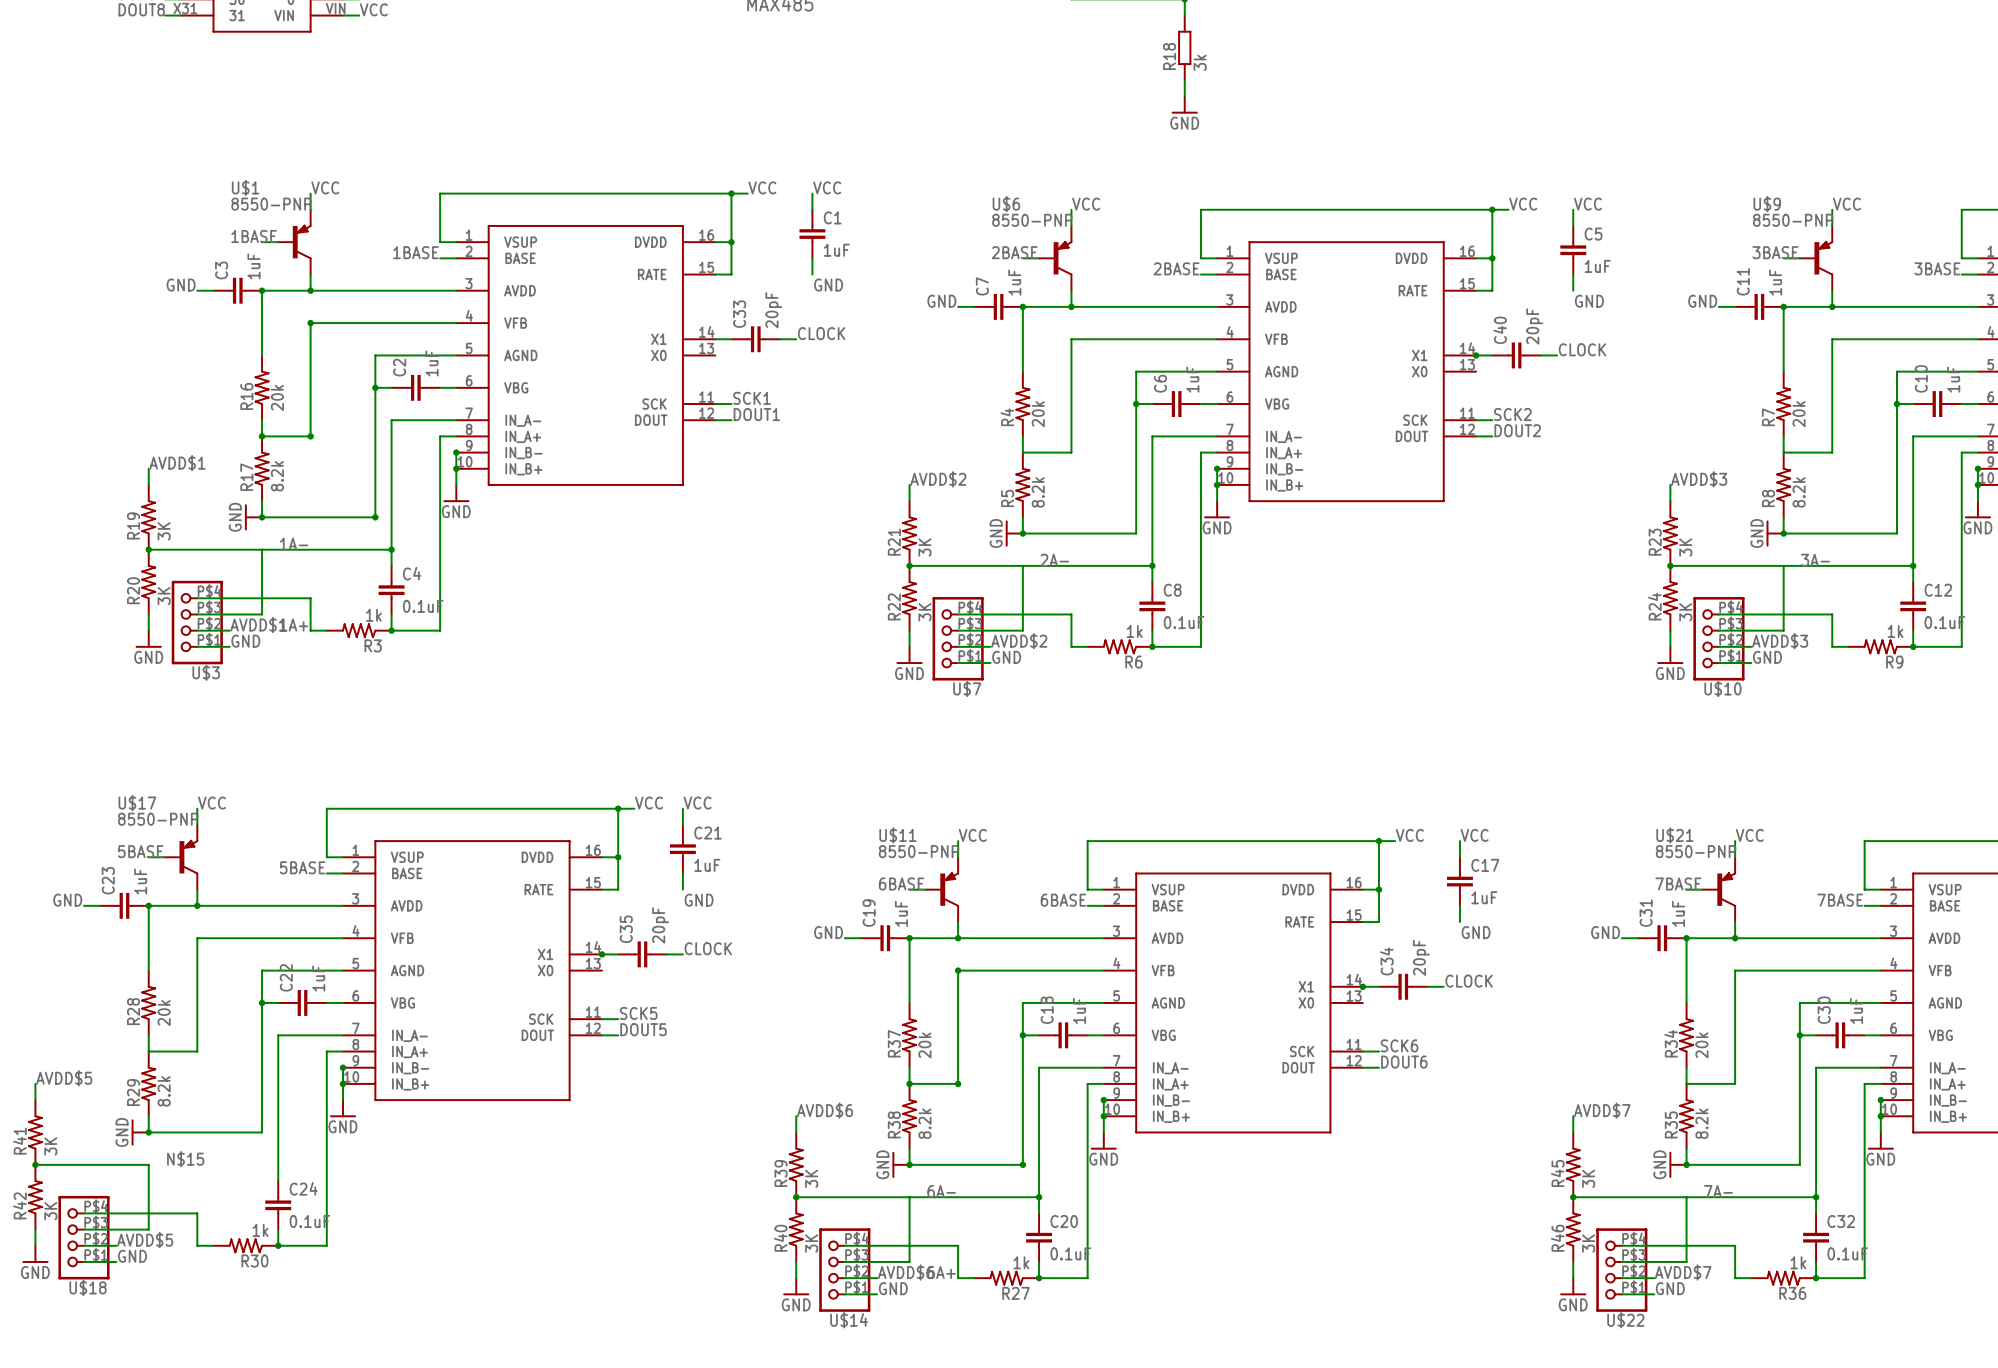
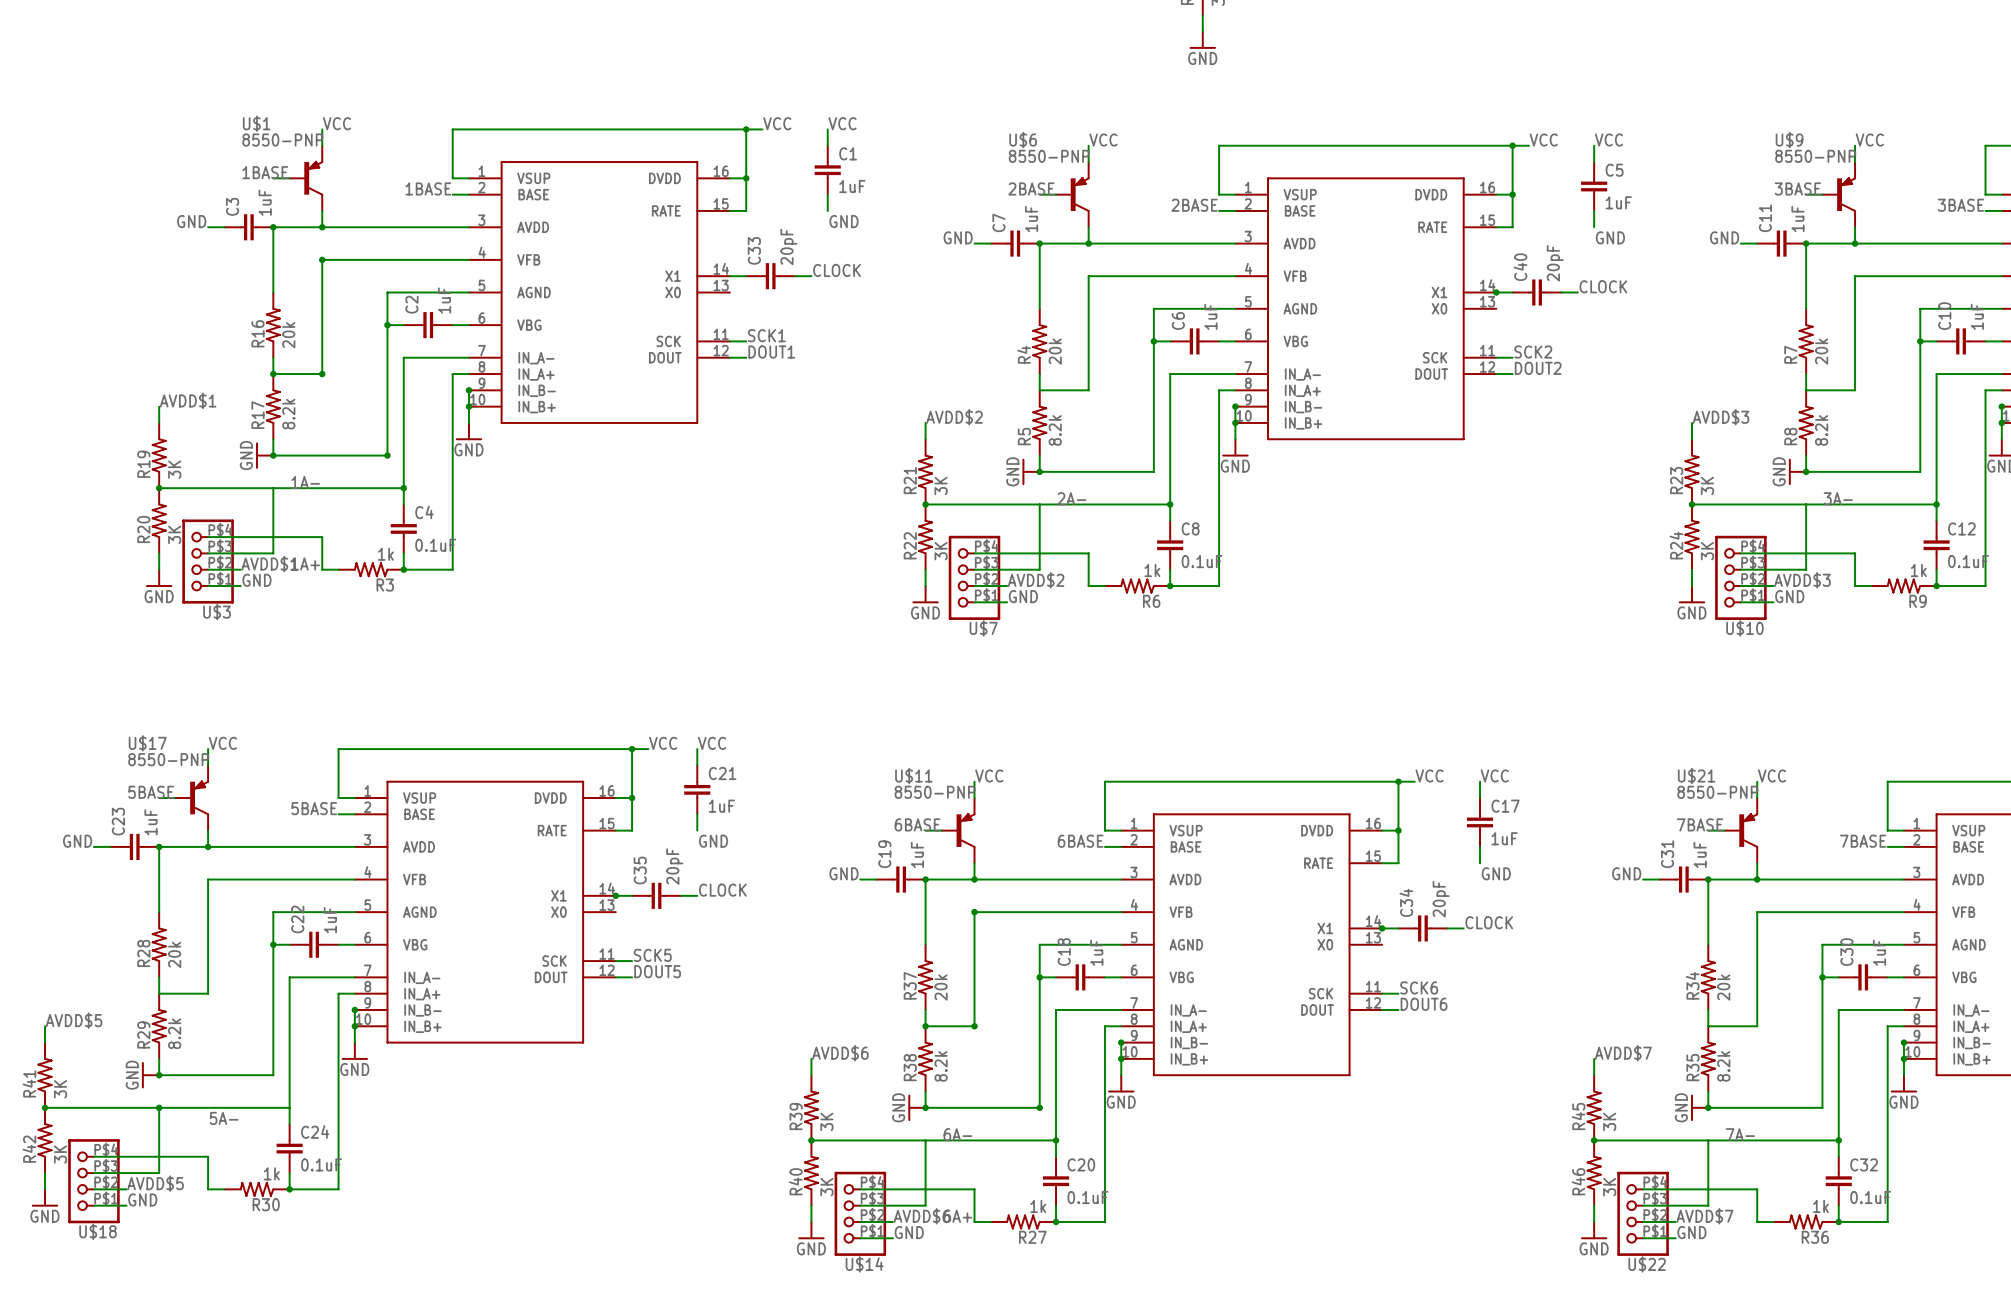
label: N$15 (185, 1159) -> none
wire: none -> (159, 1107) (289, 1107)
junction: none -> (159, 1107)
label: none -> 5A- (224, 1118)

